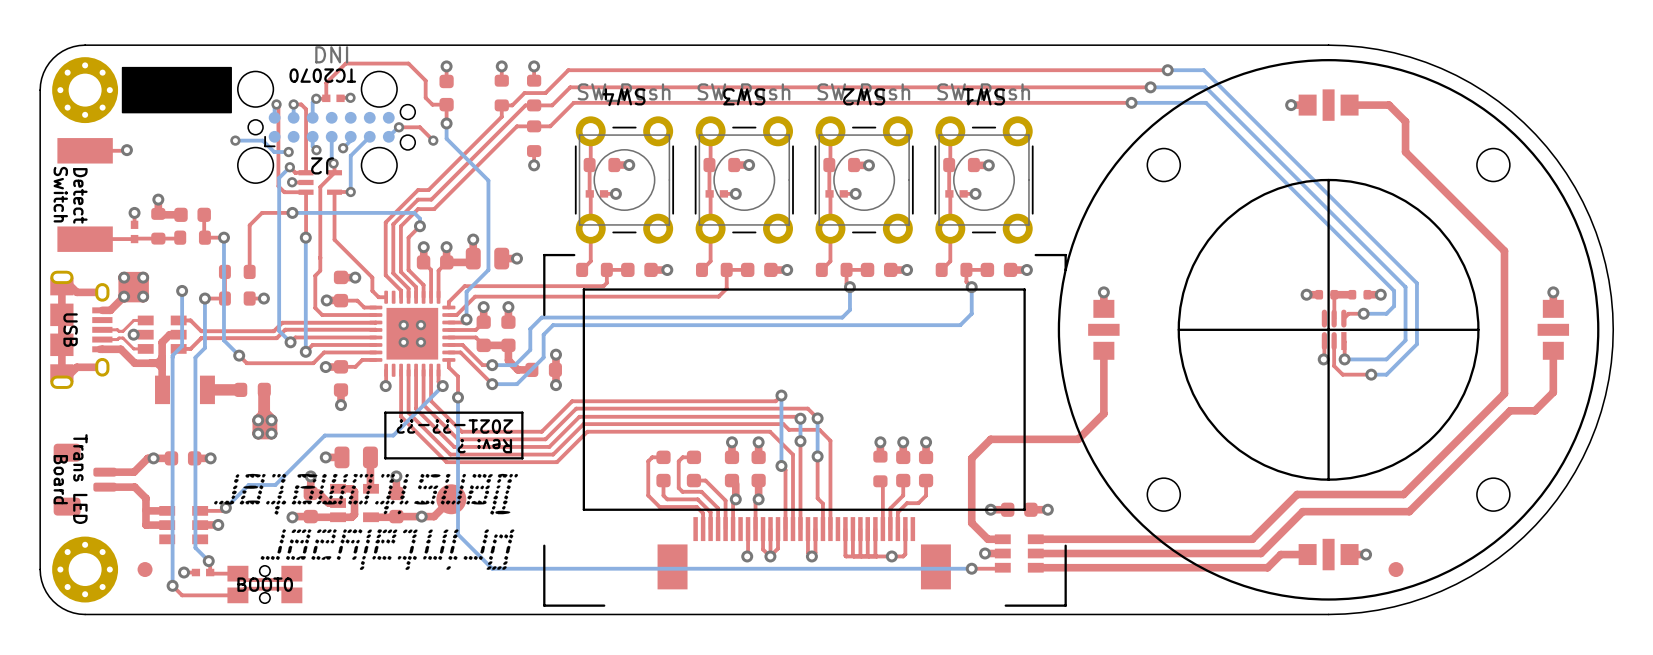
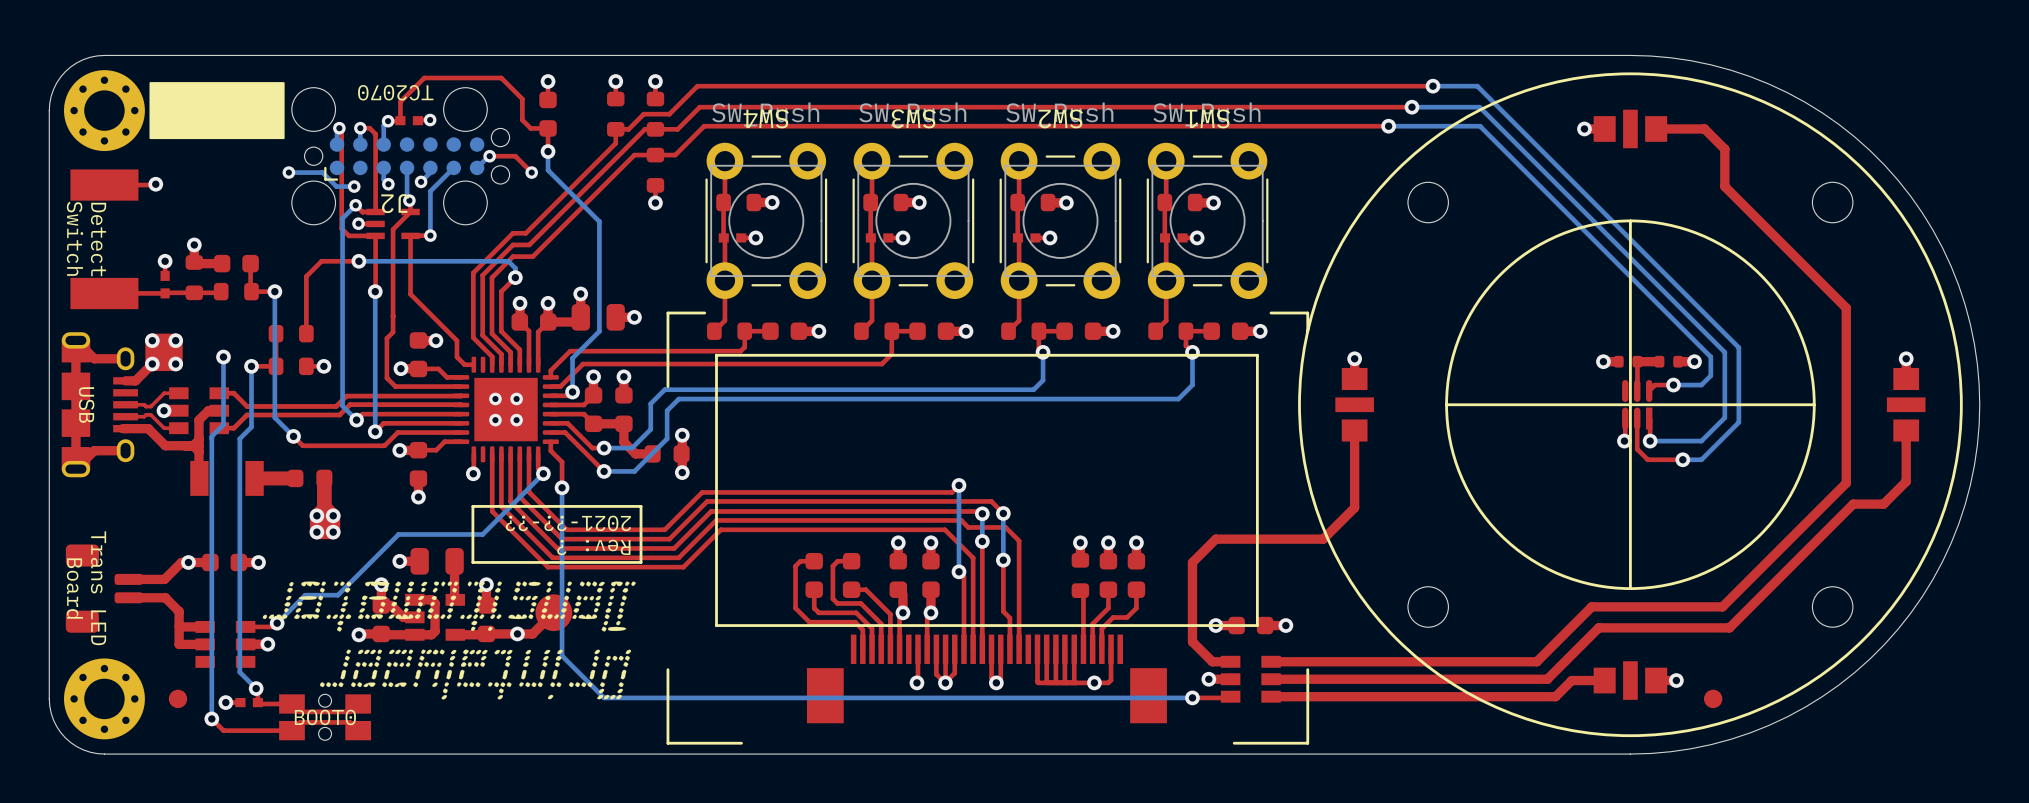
J2 value: DNI (331, 54) -> none

